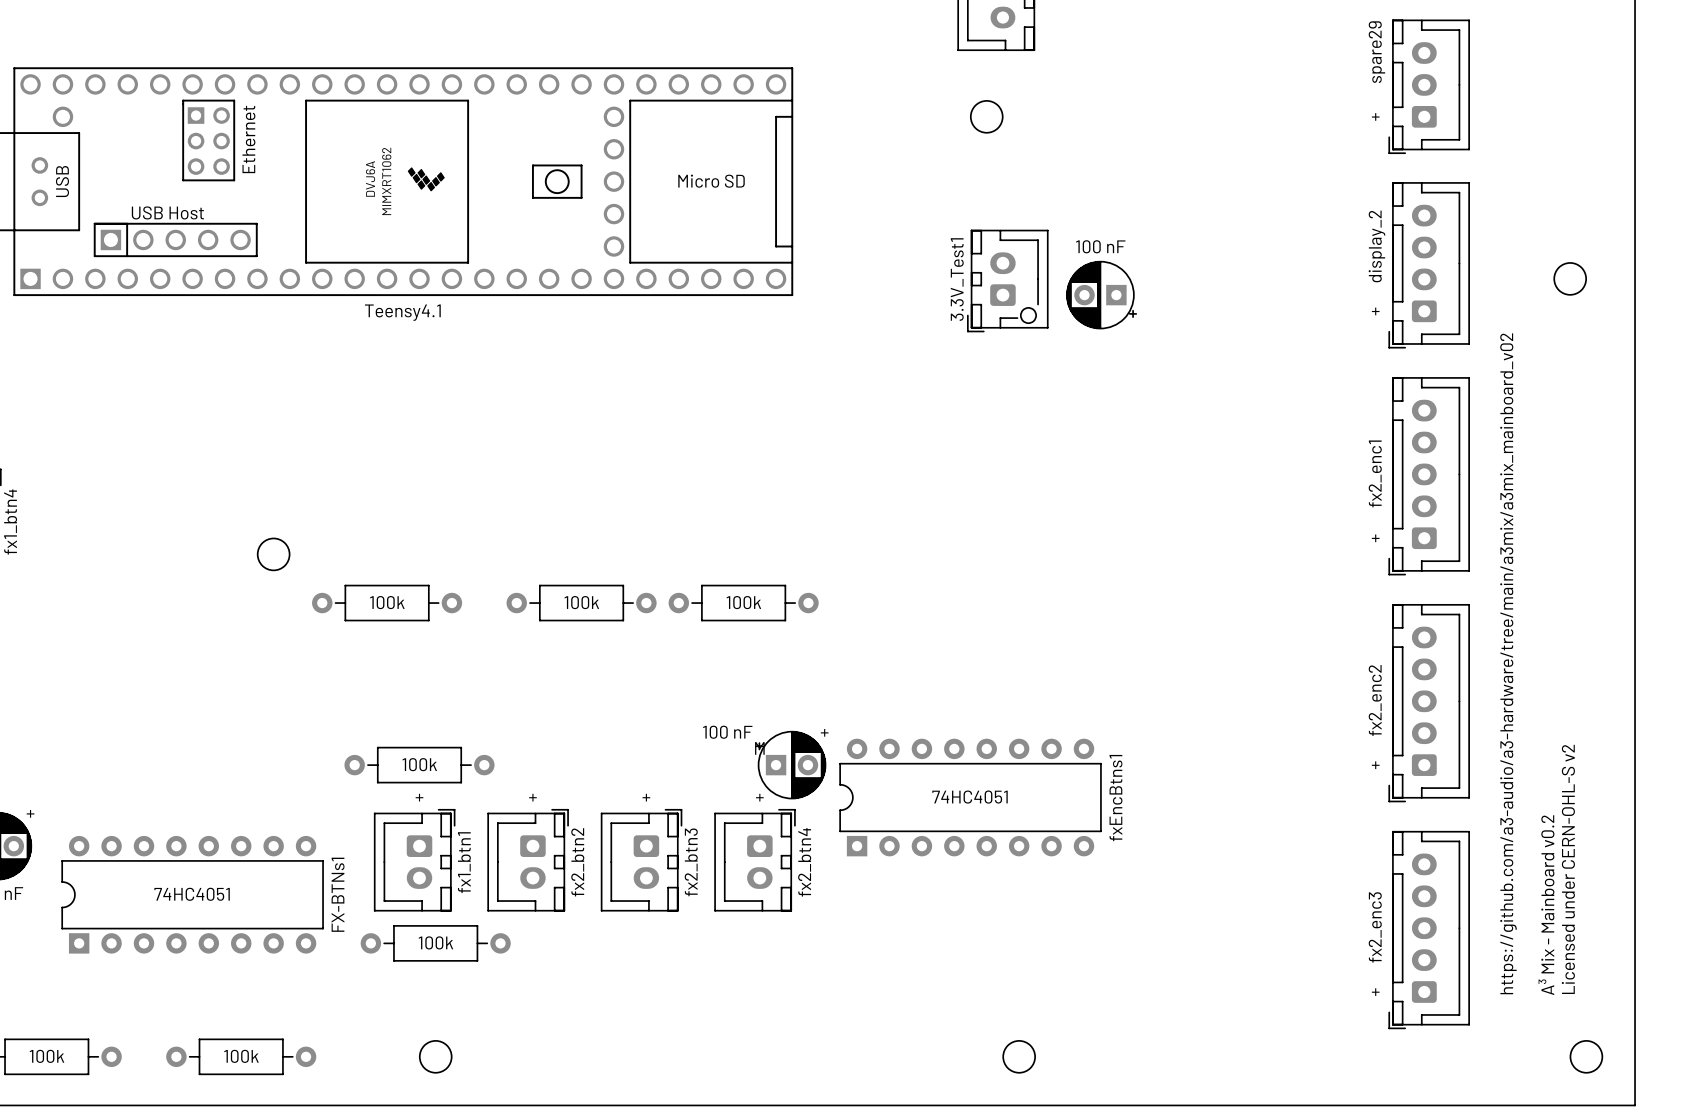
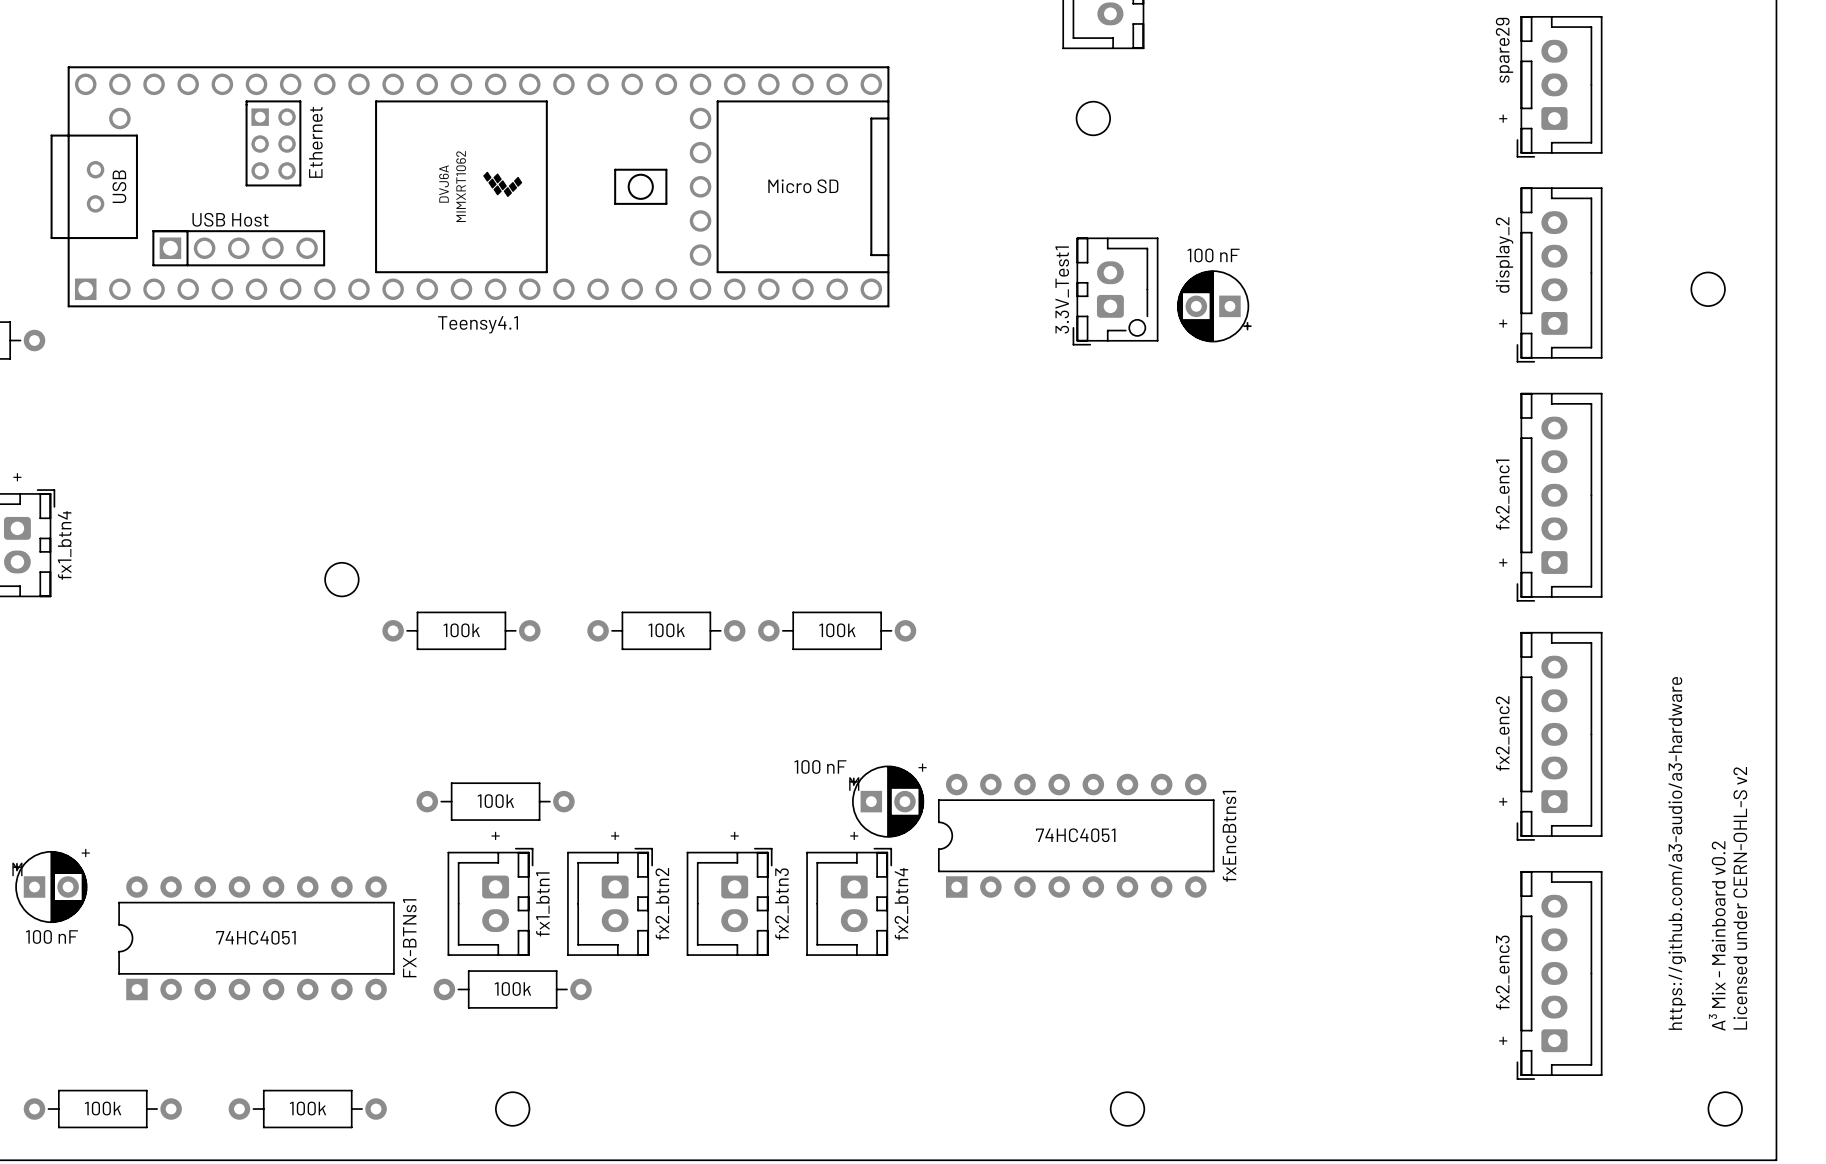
text: https://github.com/a3-audio/a3-hardware/tree/main/a3mix/a3mix_mainboard_v02 (1508, 663) -> none
text: none -> https://github.com/a3-audio/a3-hardware (1677, 853)
text position: Licensed under CERN-OHL-S v2 (1568, 869) -> Licensed under CERN-OHL-S v2 (1740, 898)
text position: A³ Mix - Mainboard v0.2 (1546, 905) -> A³ Mix - Mainboard v0.2 (1717, 936)

